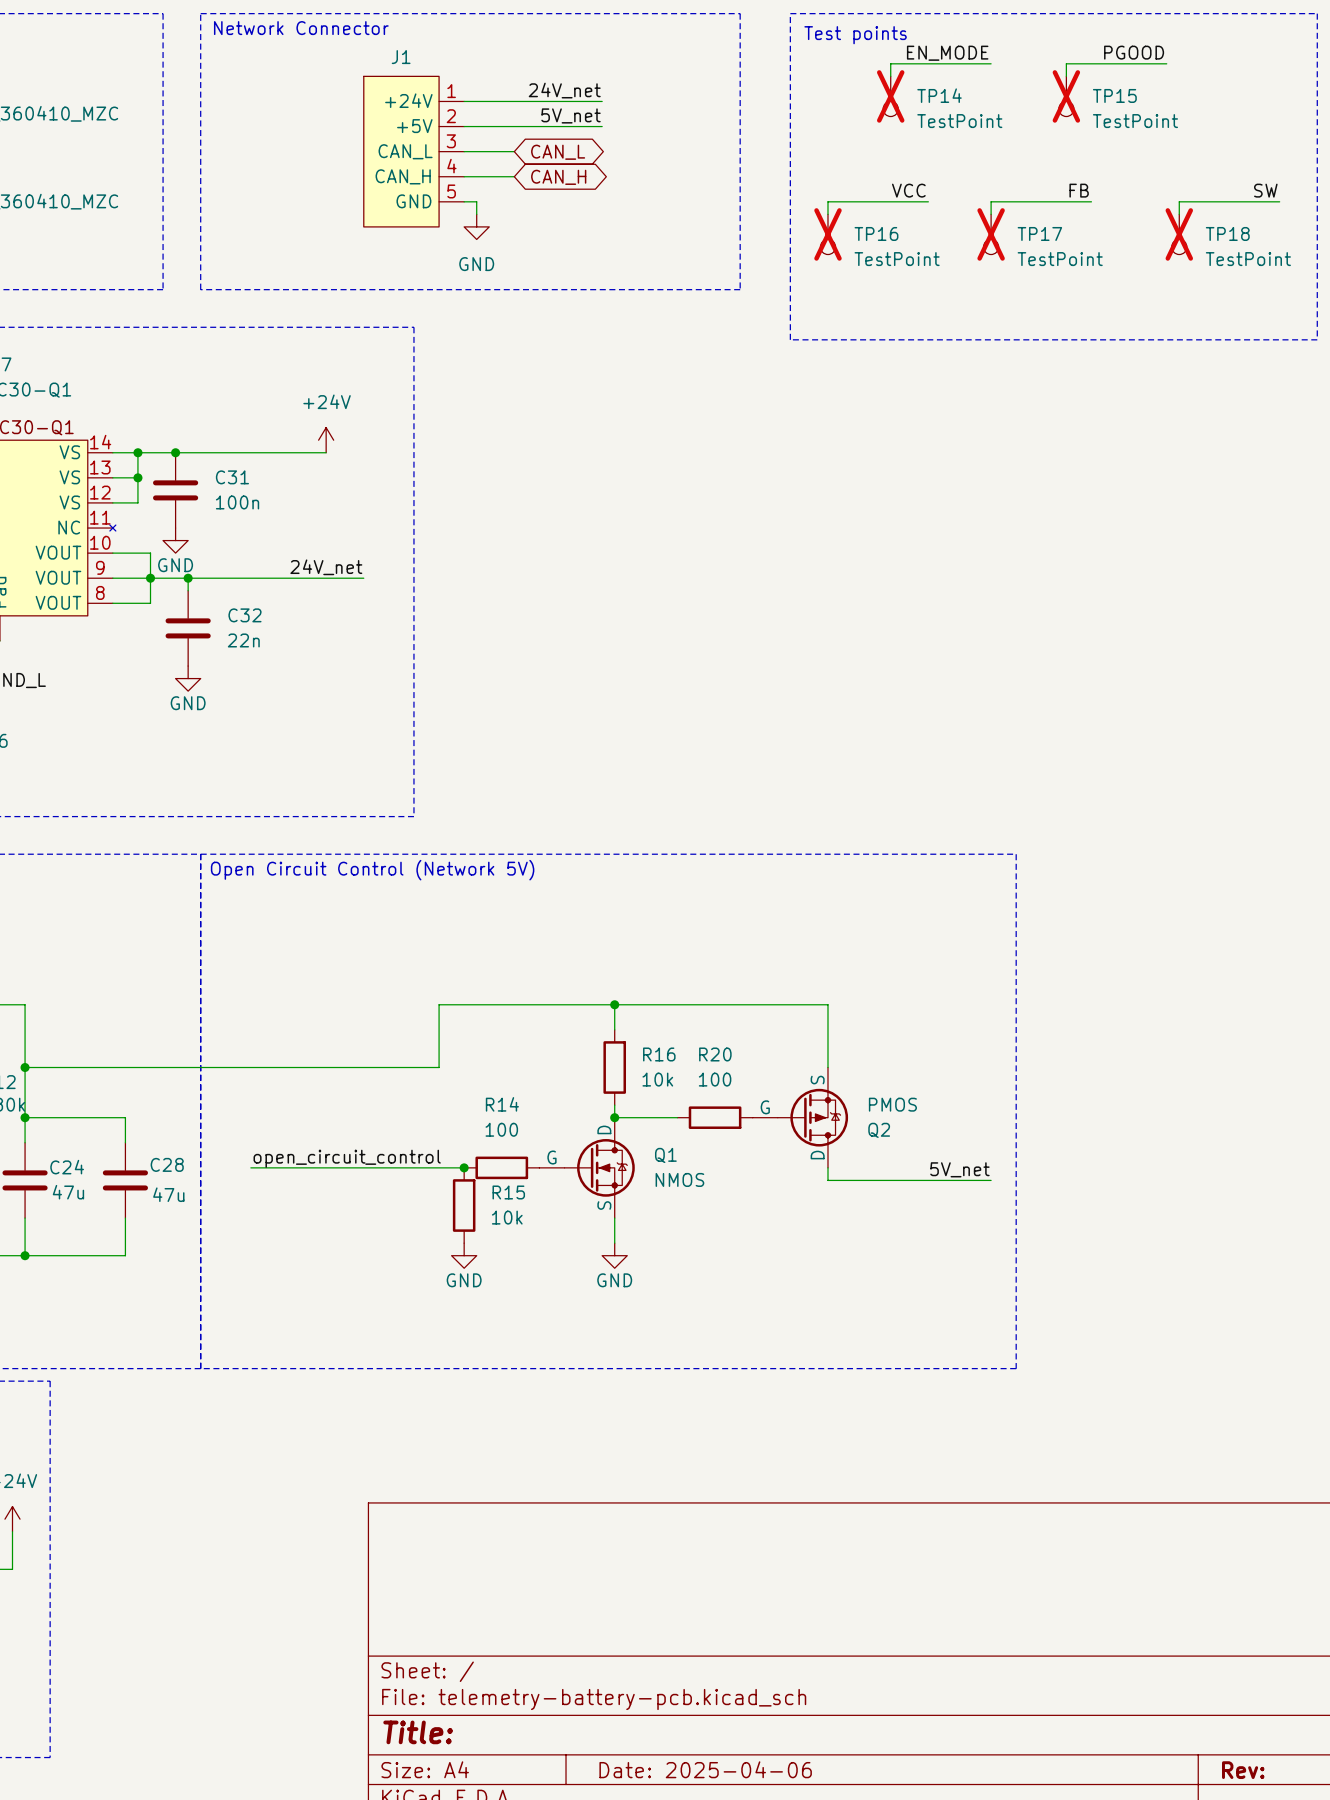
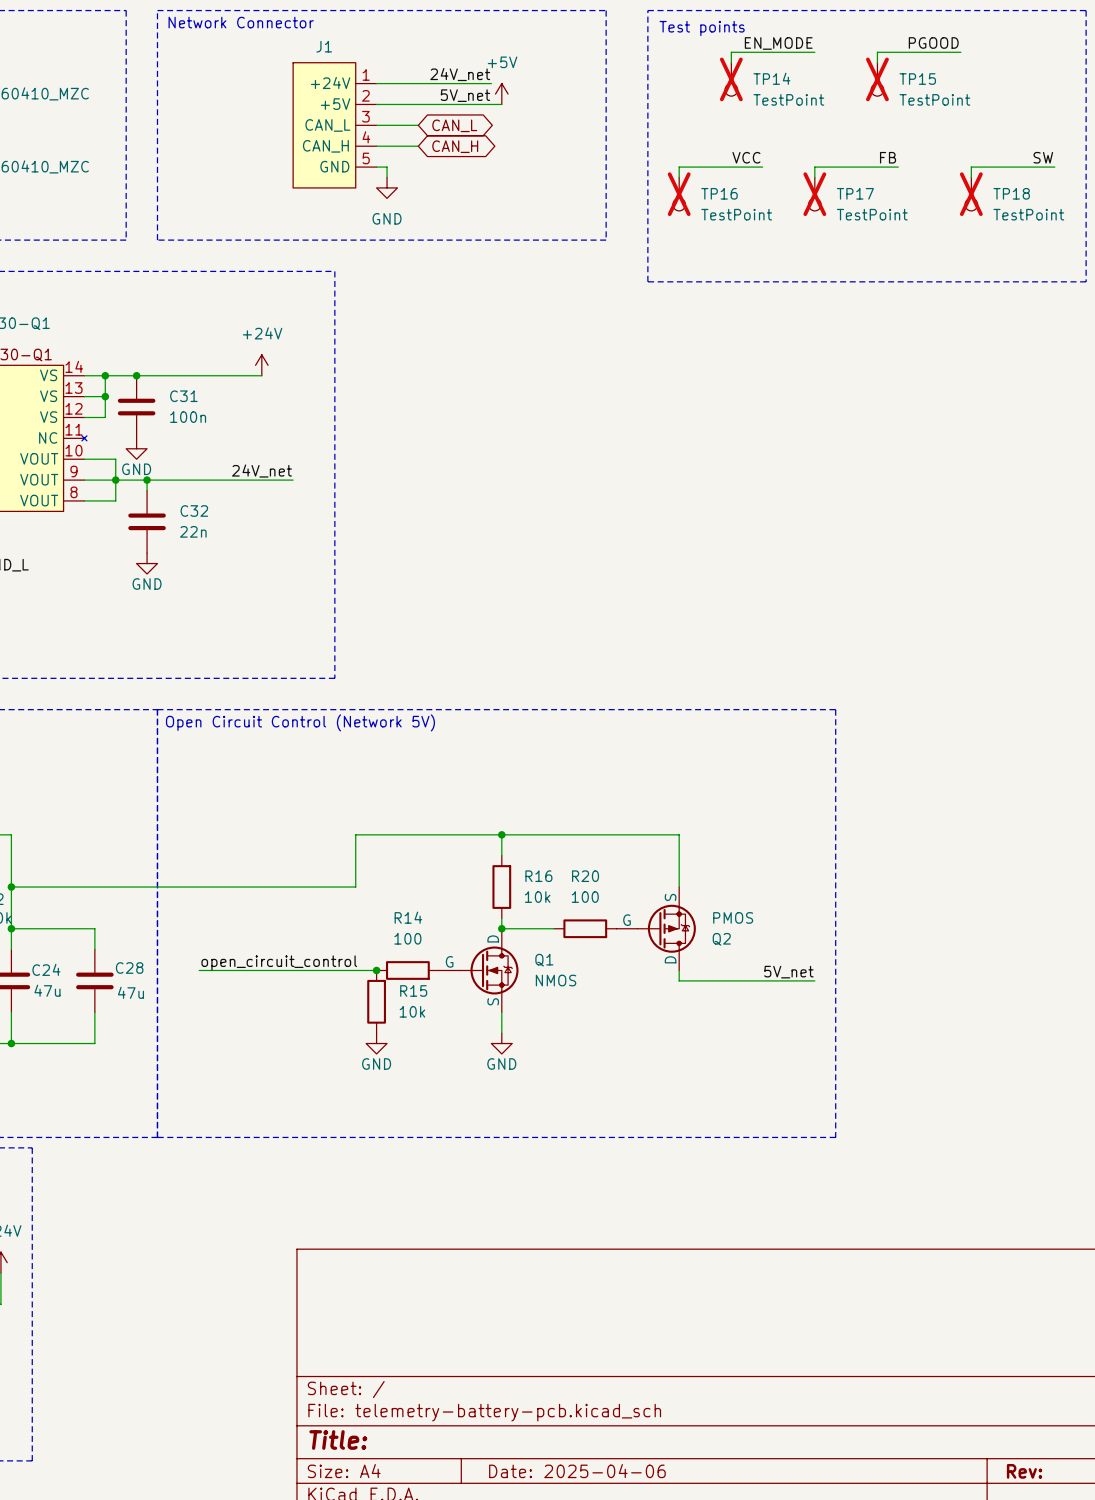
power symbol: none -> +5V (501, 94)
wire: none -> (491, 104) (501, 104)

